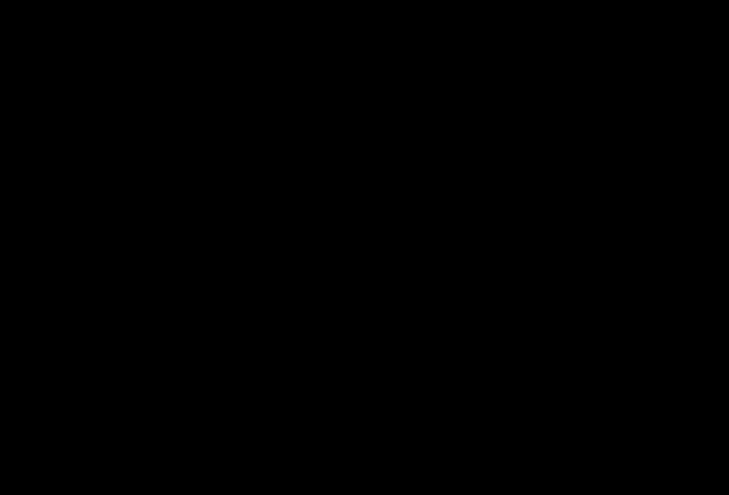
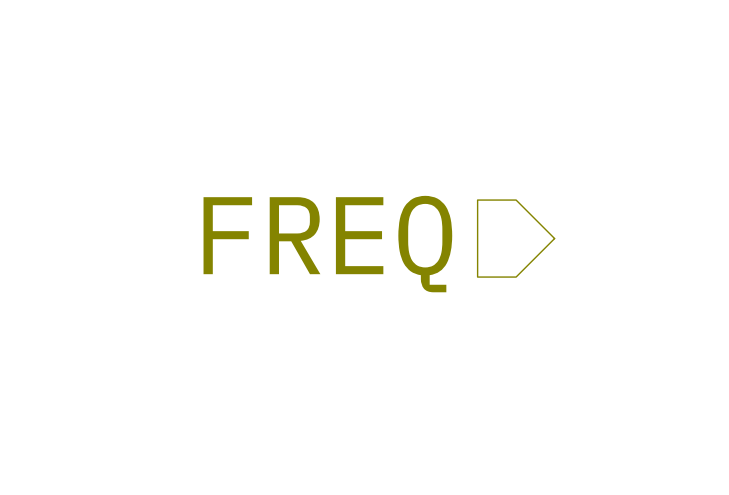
hierarchical label: none -> FREQ (327, 244)

